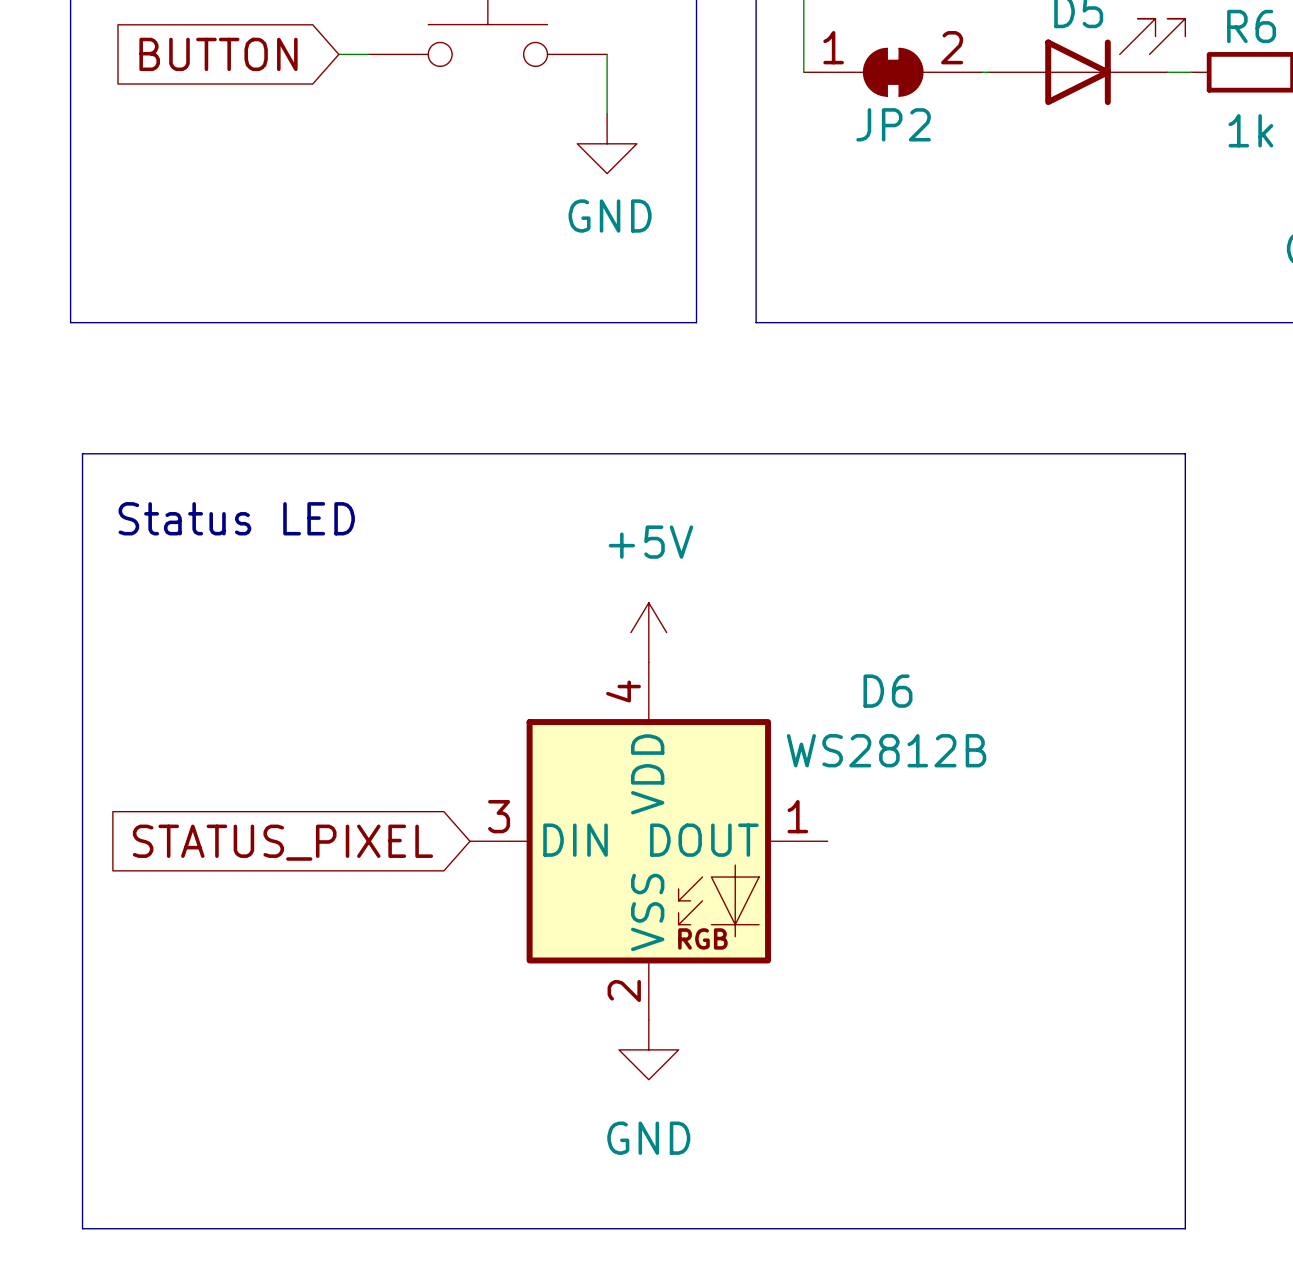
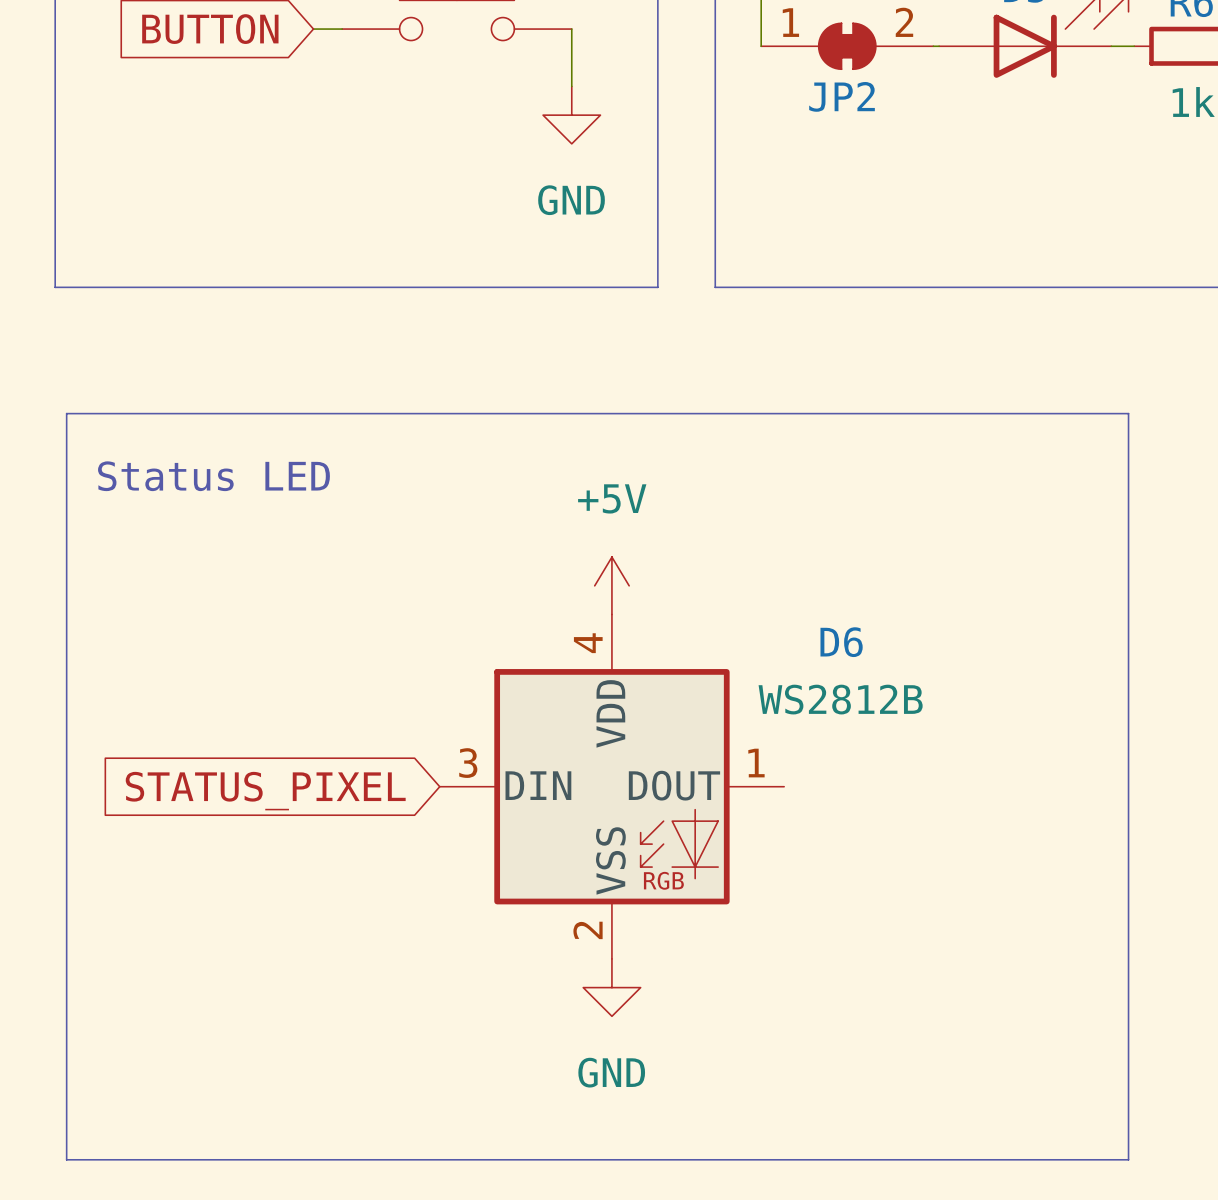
power symbol text position: GND (610, 216) -> GND (571, 200)

